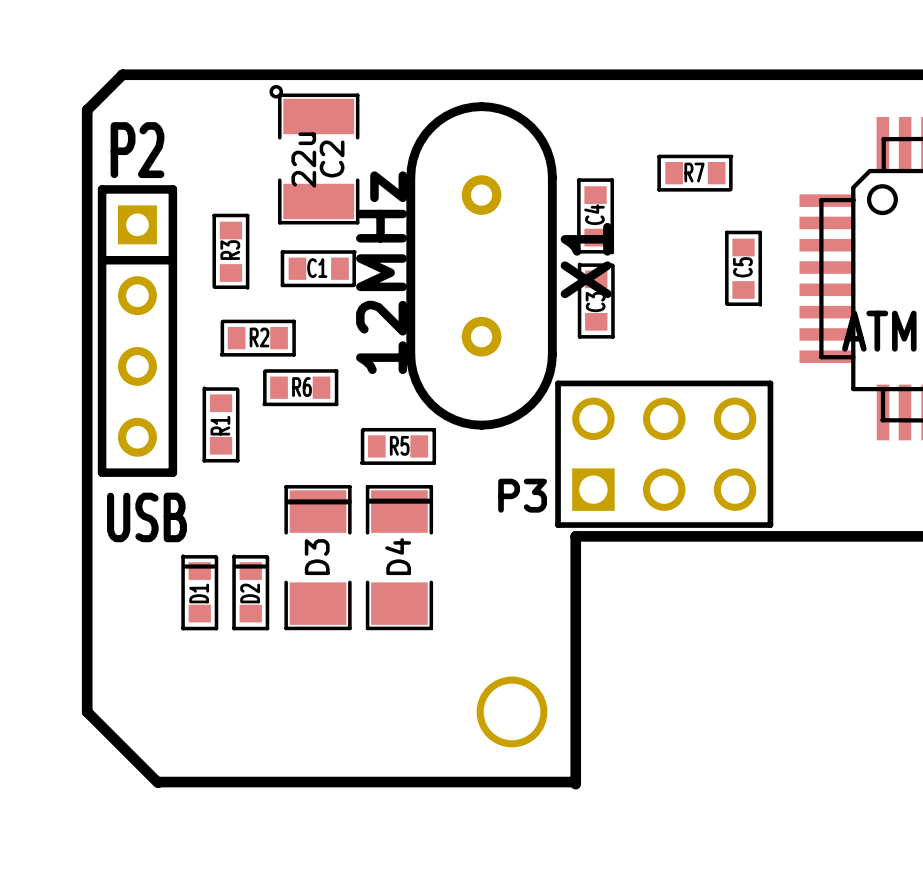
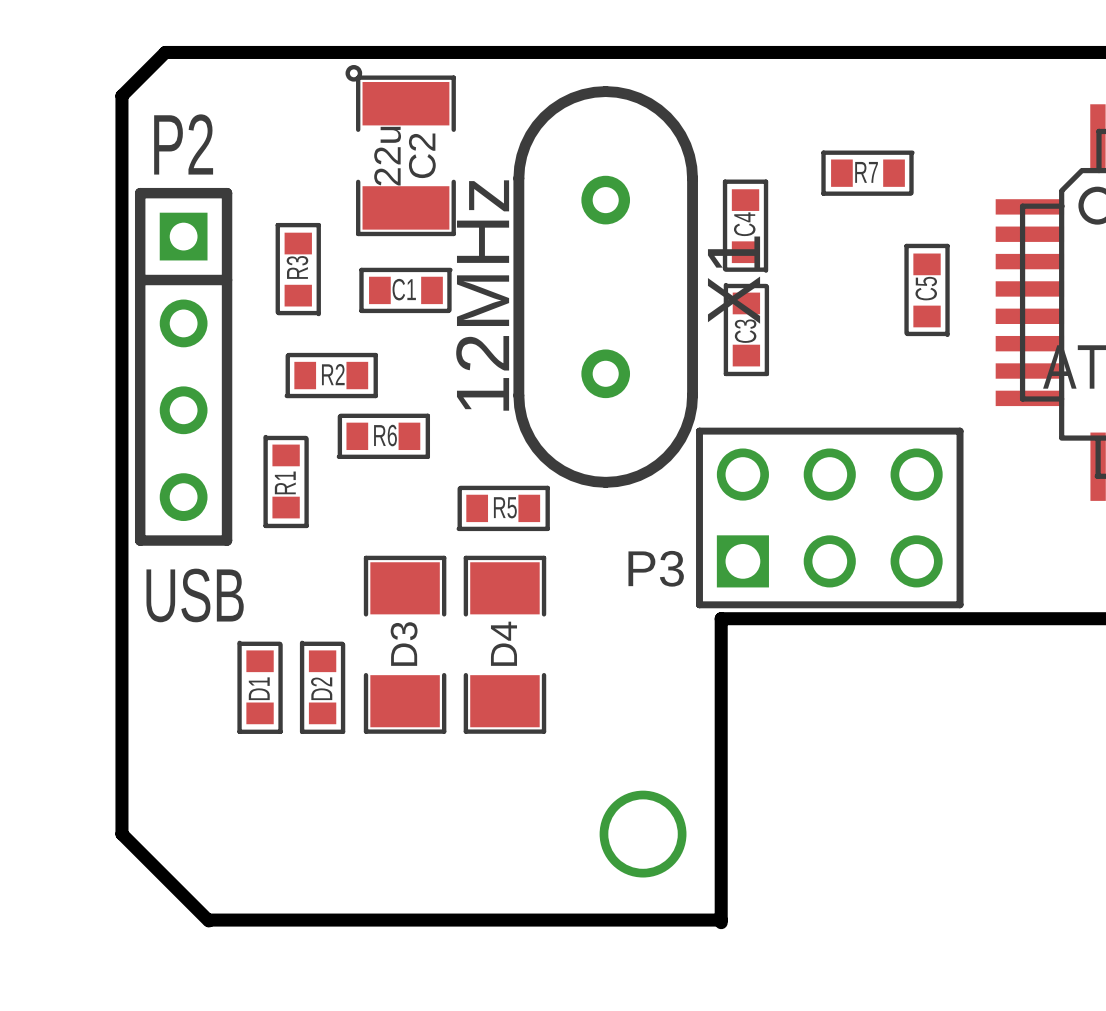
D3 footprint: [284, 485, 352, 631] -> [363, 555, 447, 734]
D4 footprint: [365, 485, 434, 631] -> [463, 555, 547, 734]
D1 footprint: [181, 554, 219, 631] -> [237, 640, 283, 734]
D2 footprint: [232, 554, 270, 631] -> [299, 640, 346, 734]

